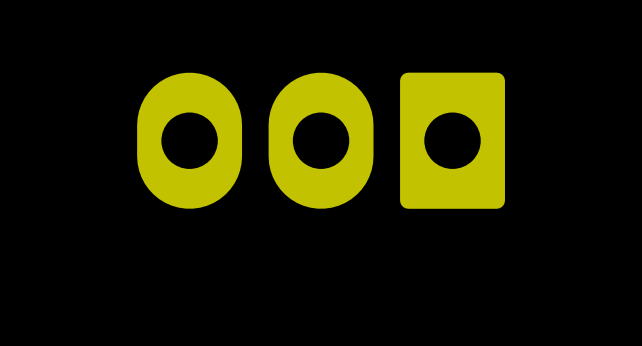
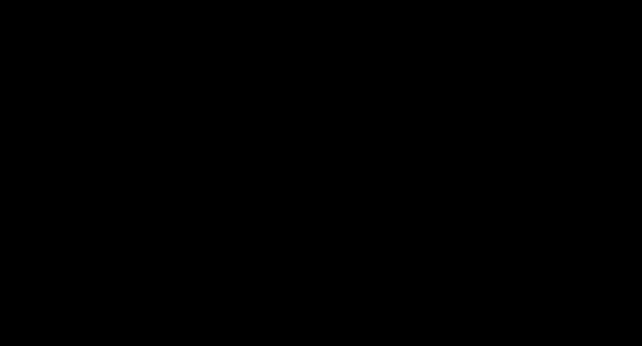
part: (321, 140) -> none

